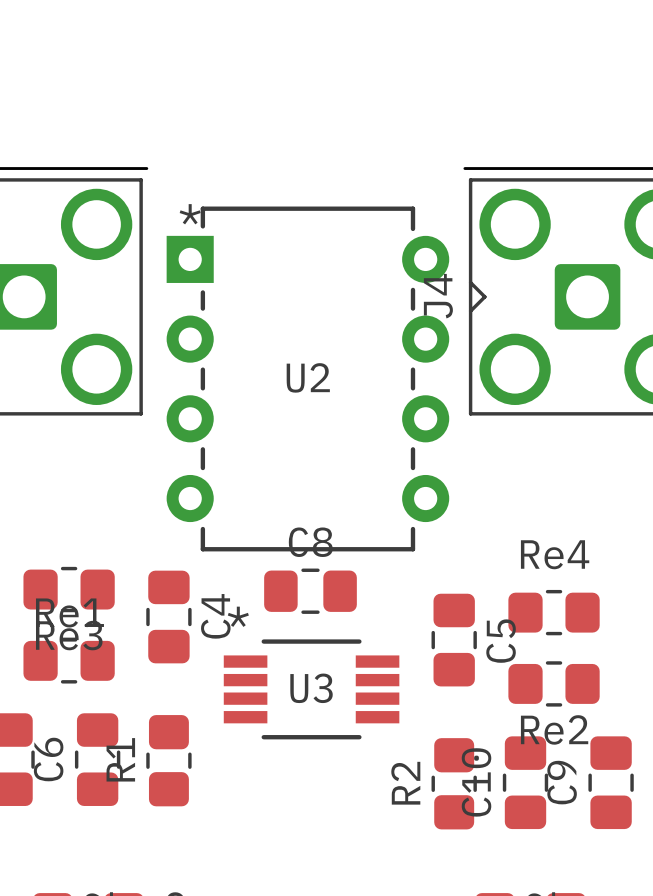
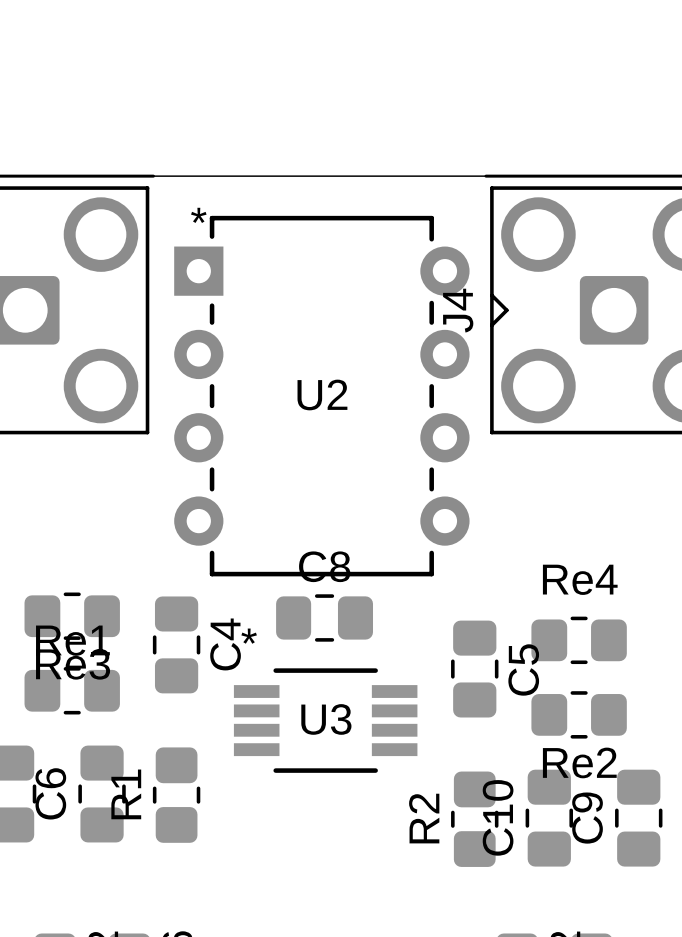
board edge: none -> (153, 176) (485, 176)

